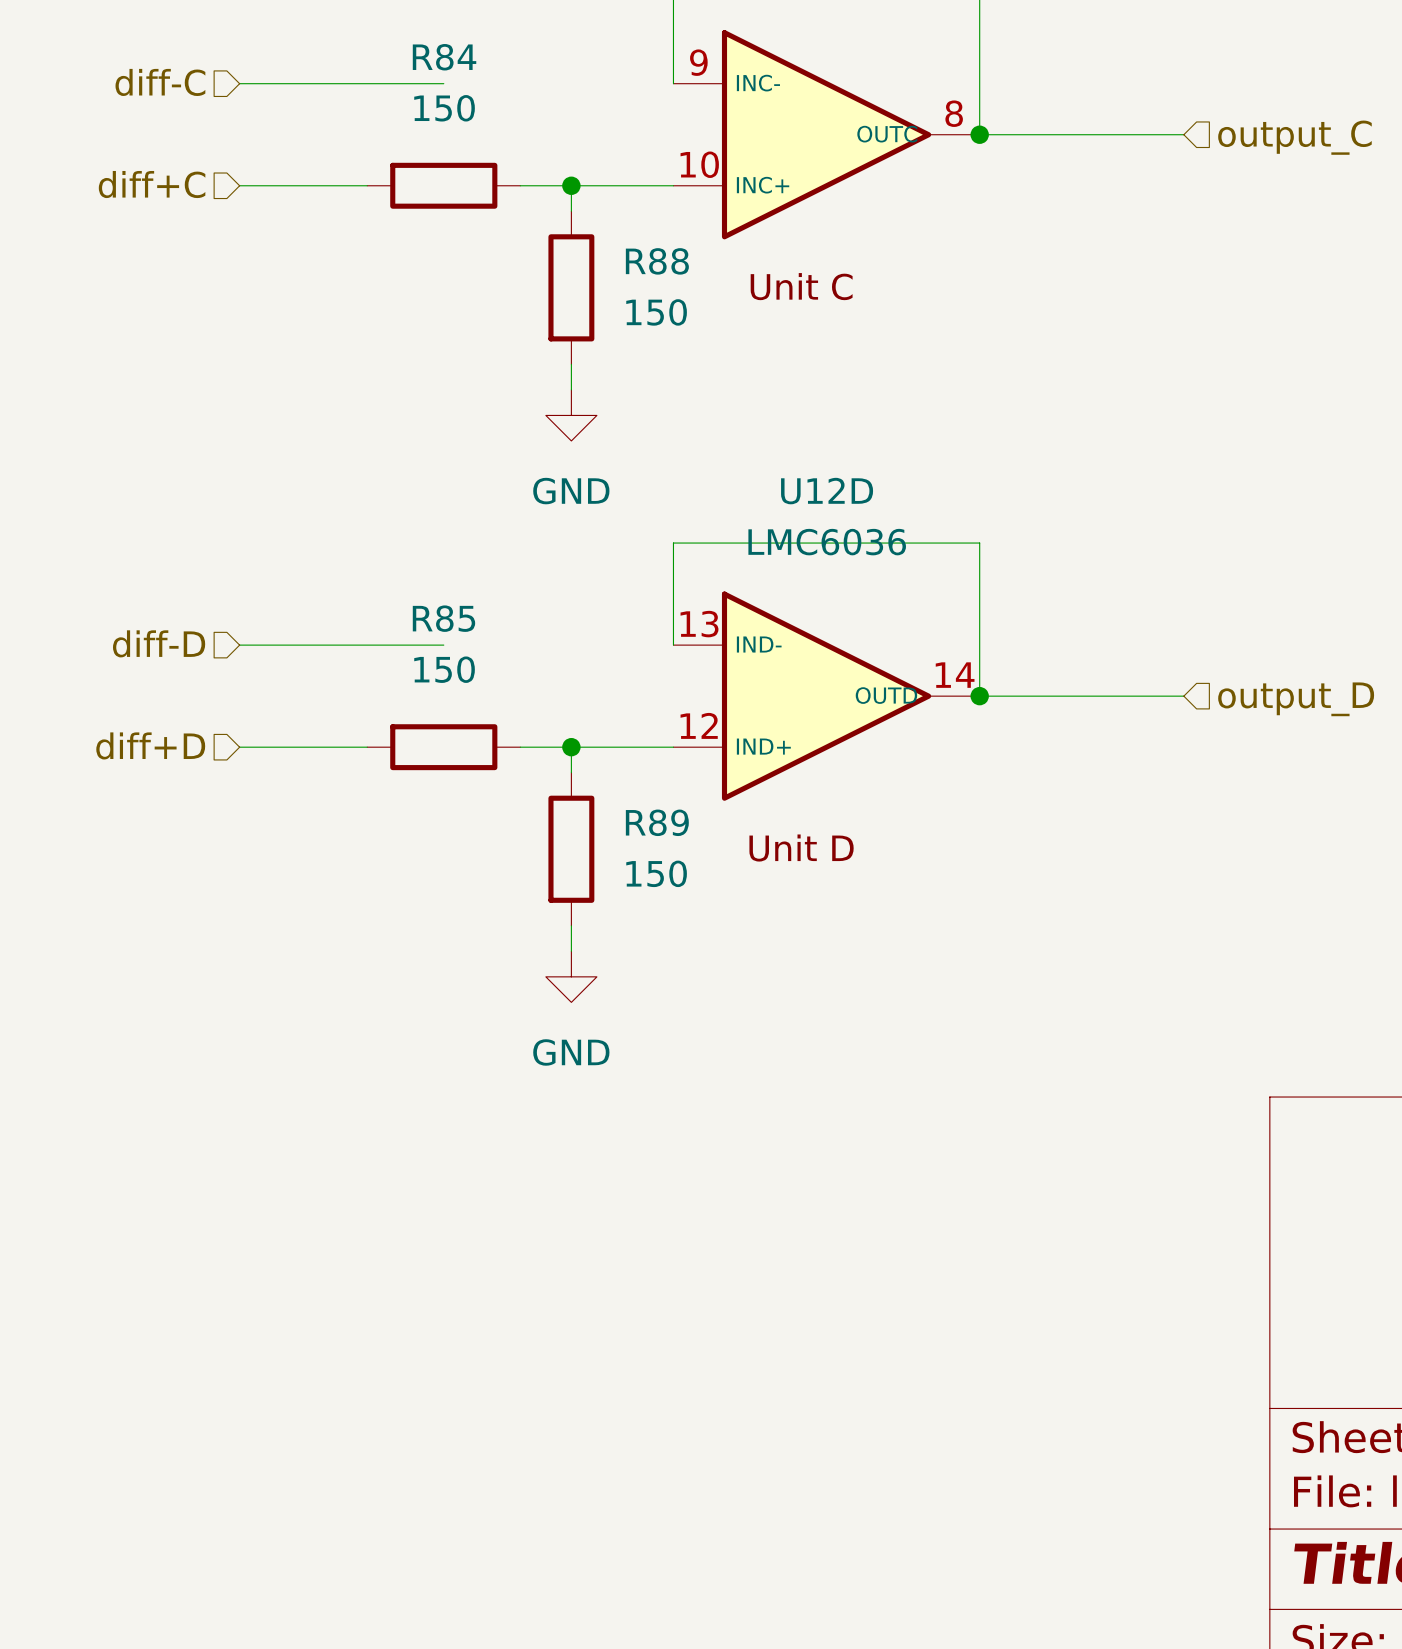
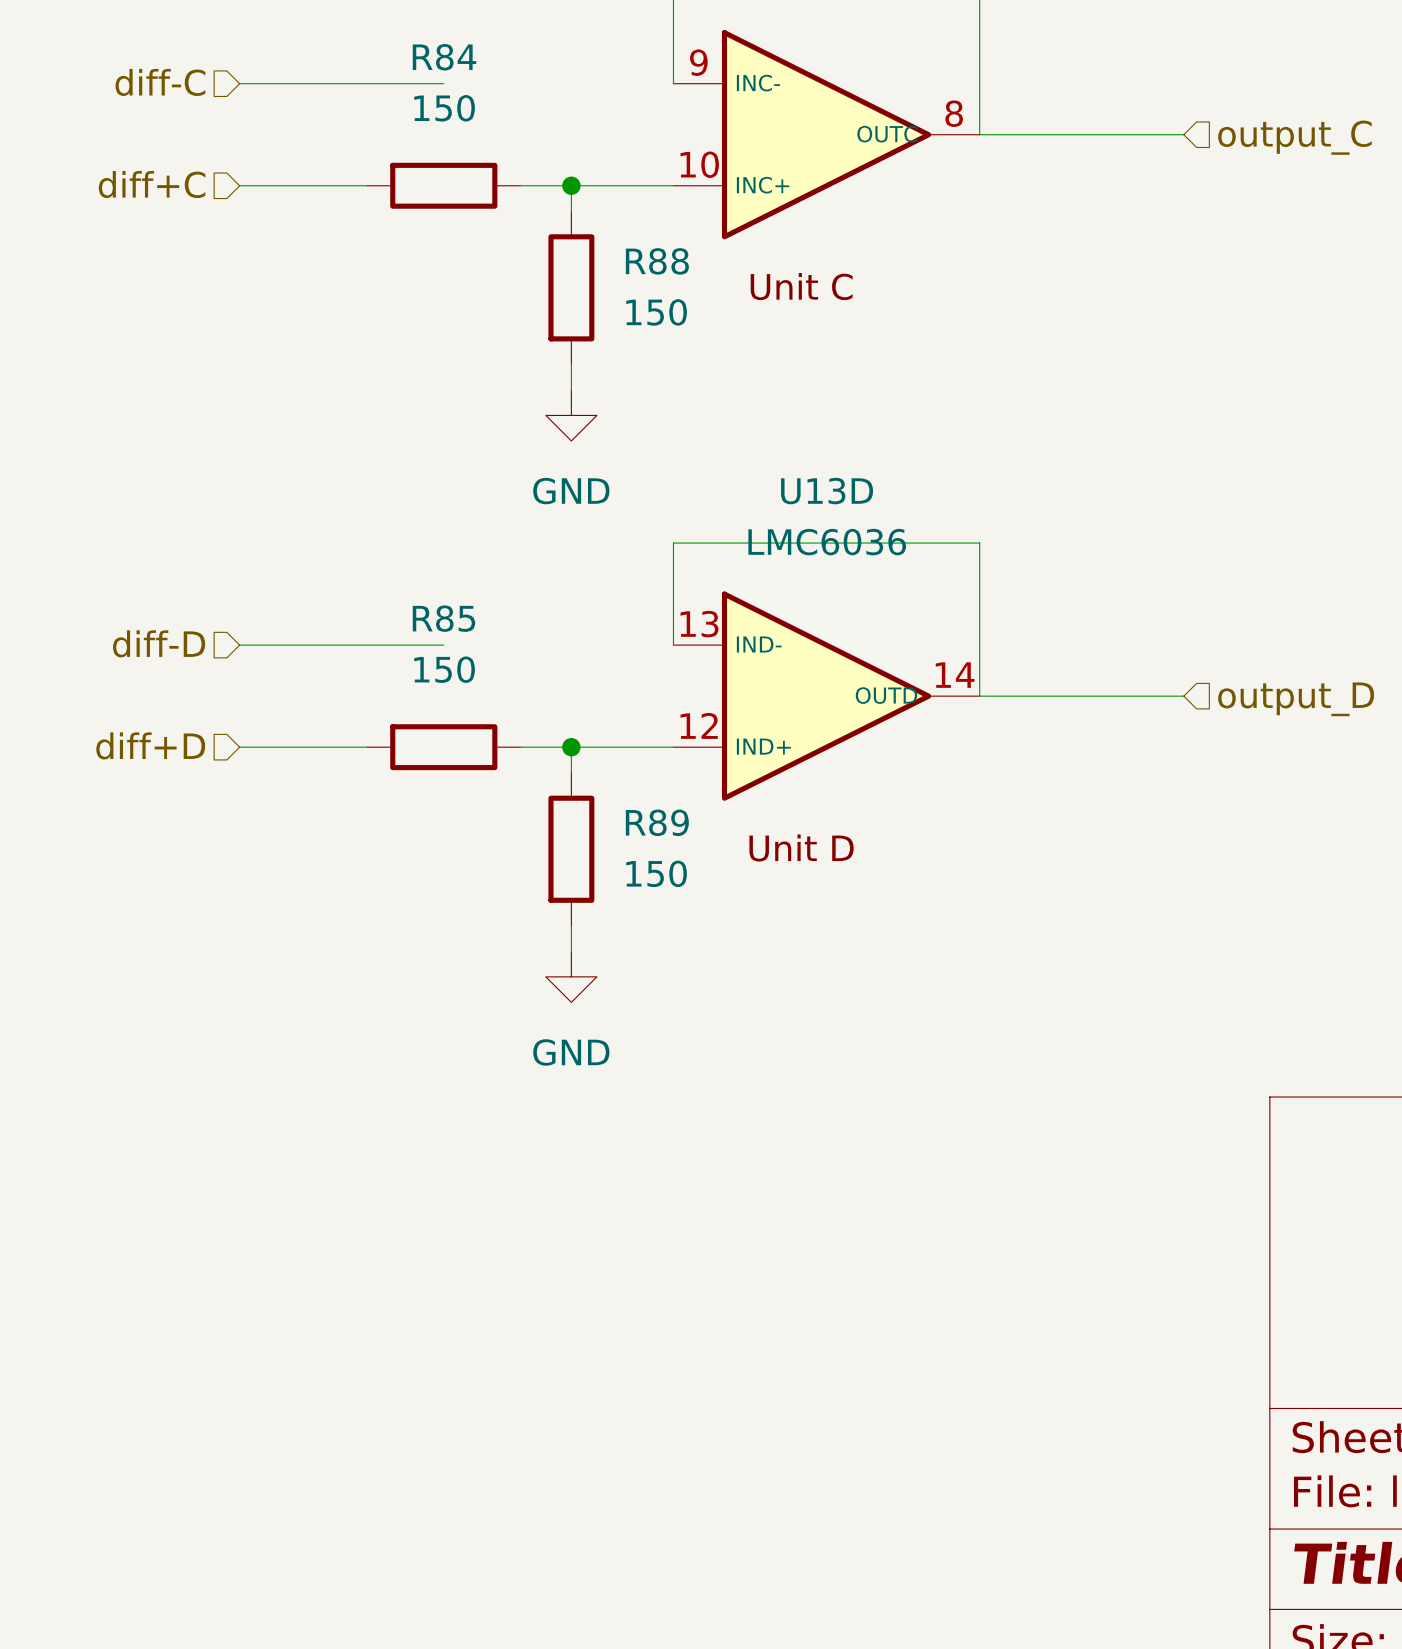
junction: (979, 134) -> none
U12D name: U12D (827, 491) -> U13D (827, 491)
junction: (979, 696) -> none

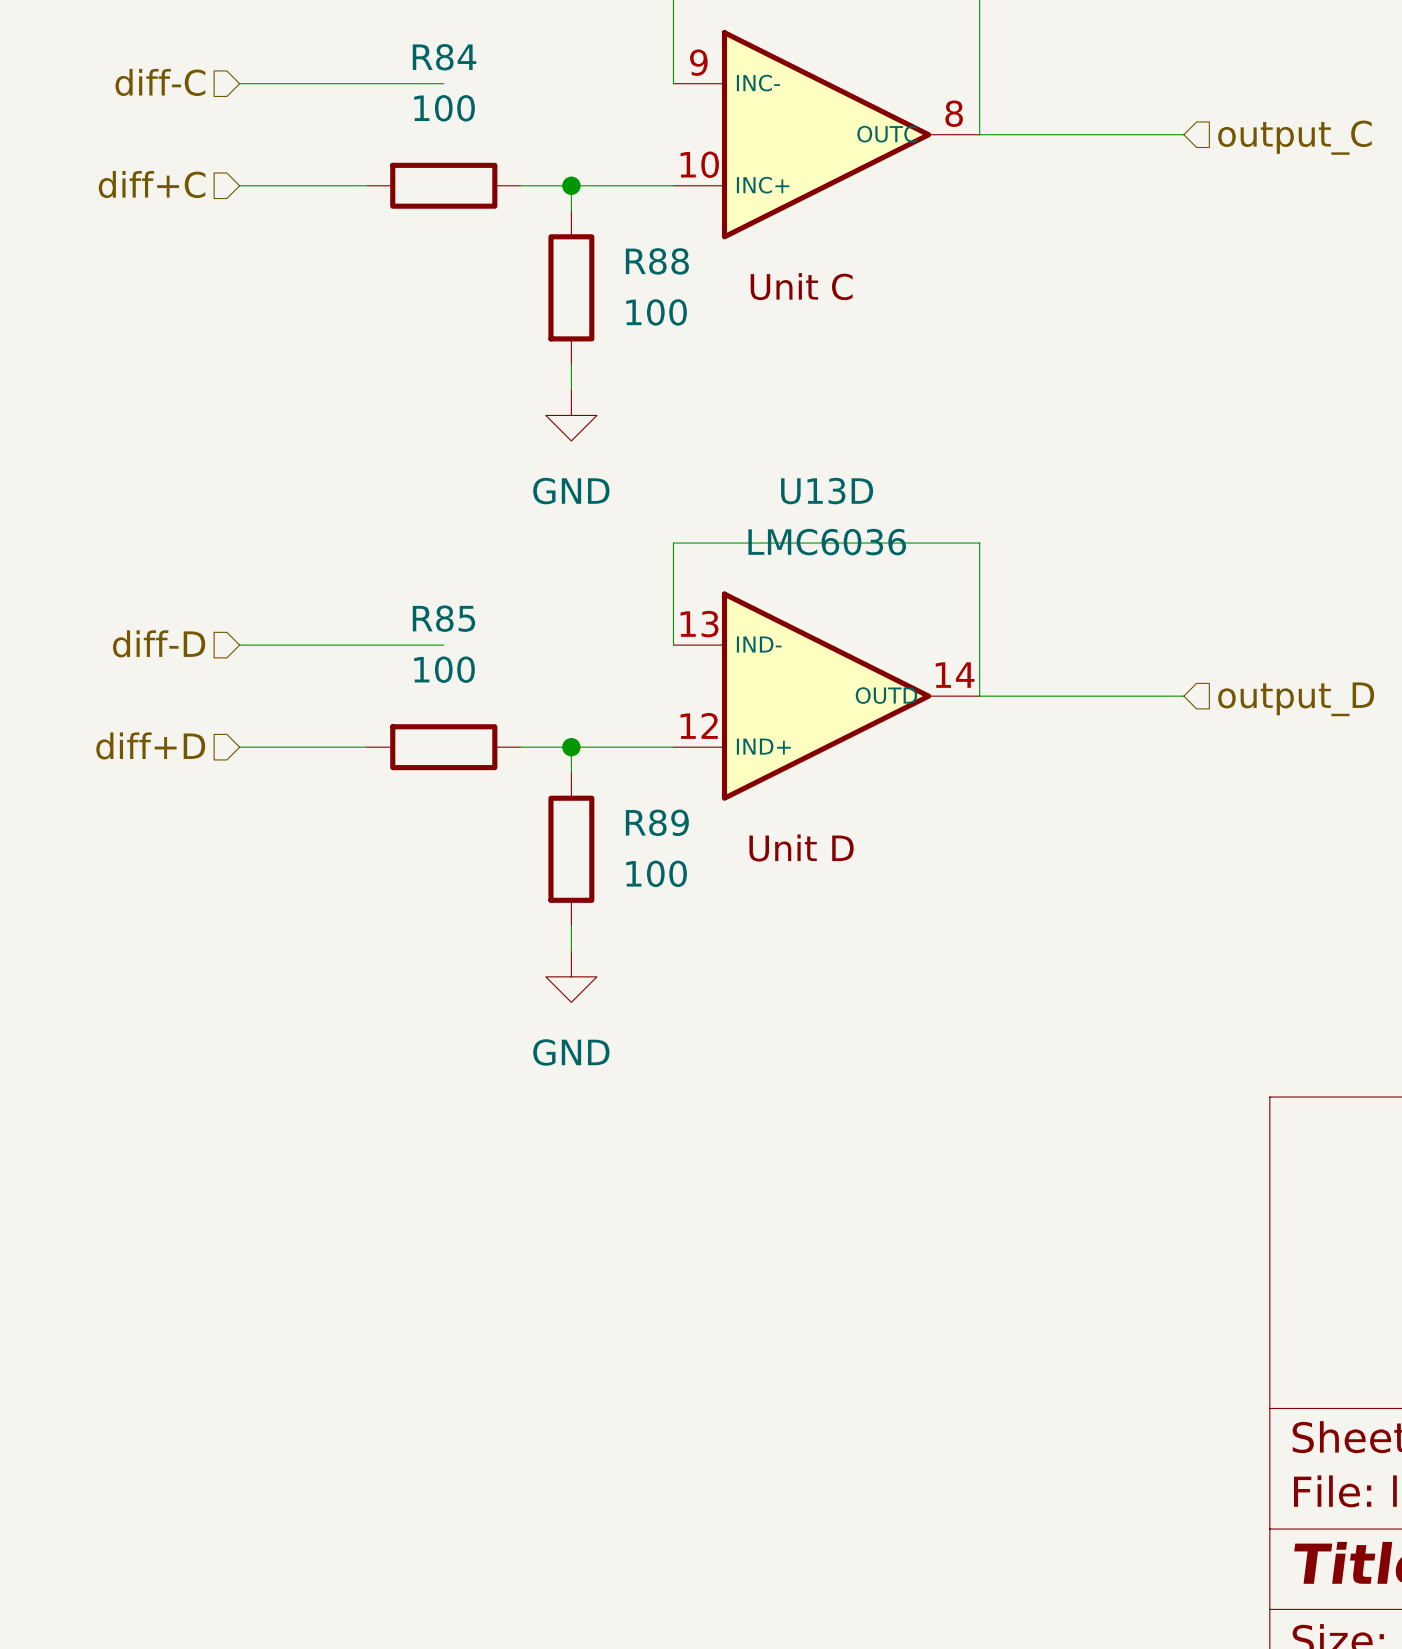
R84 value: 150 (444, 108) -> 100 (444, 108)
R88 value: 150 (656, 312) -> 100 (656, 312)
R85 value: 150 (444, 669) -> 100 (444, 669)
R89 value: 150 (656, 873) -> 100 (656, 873)

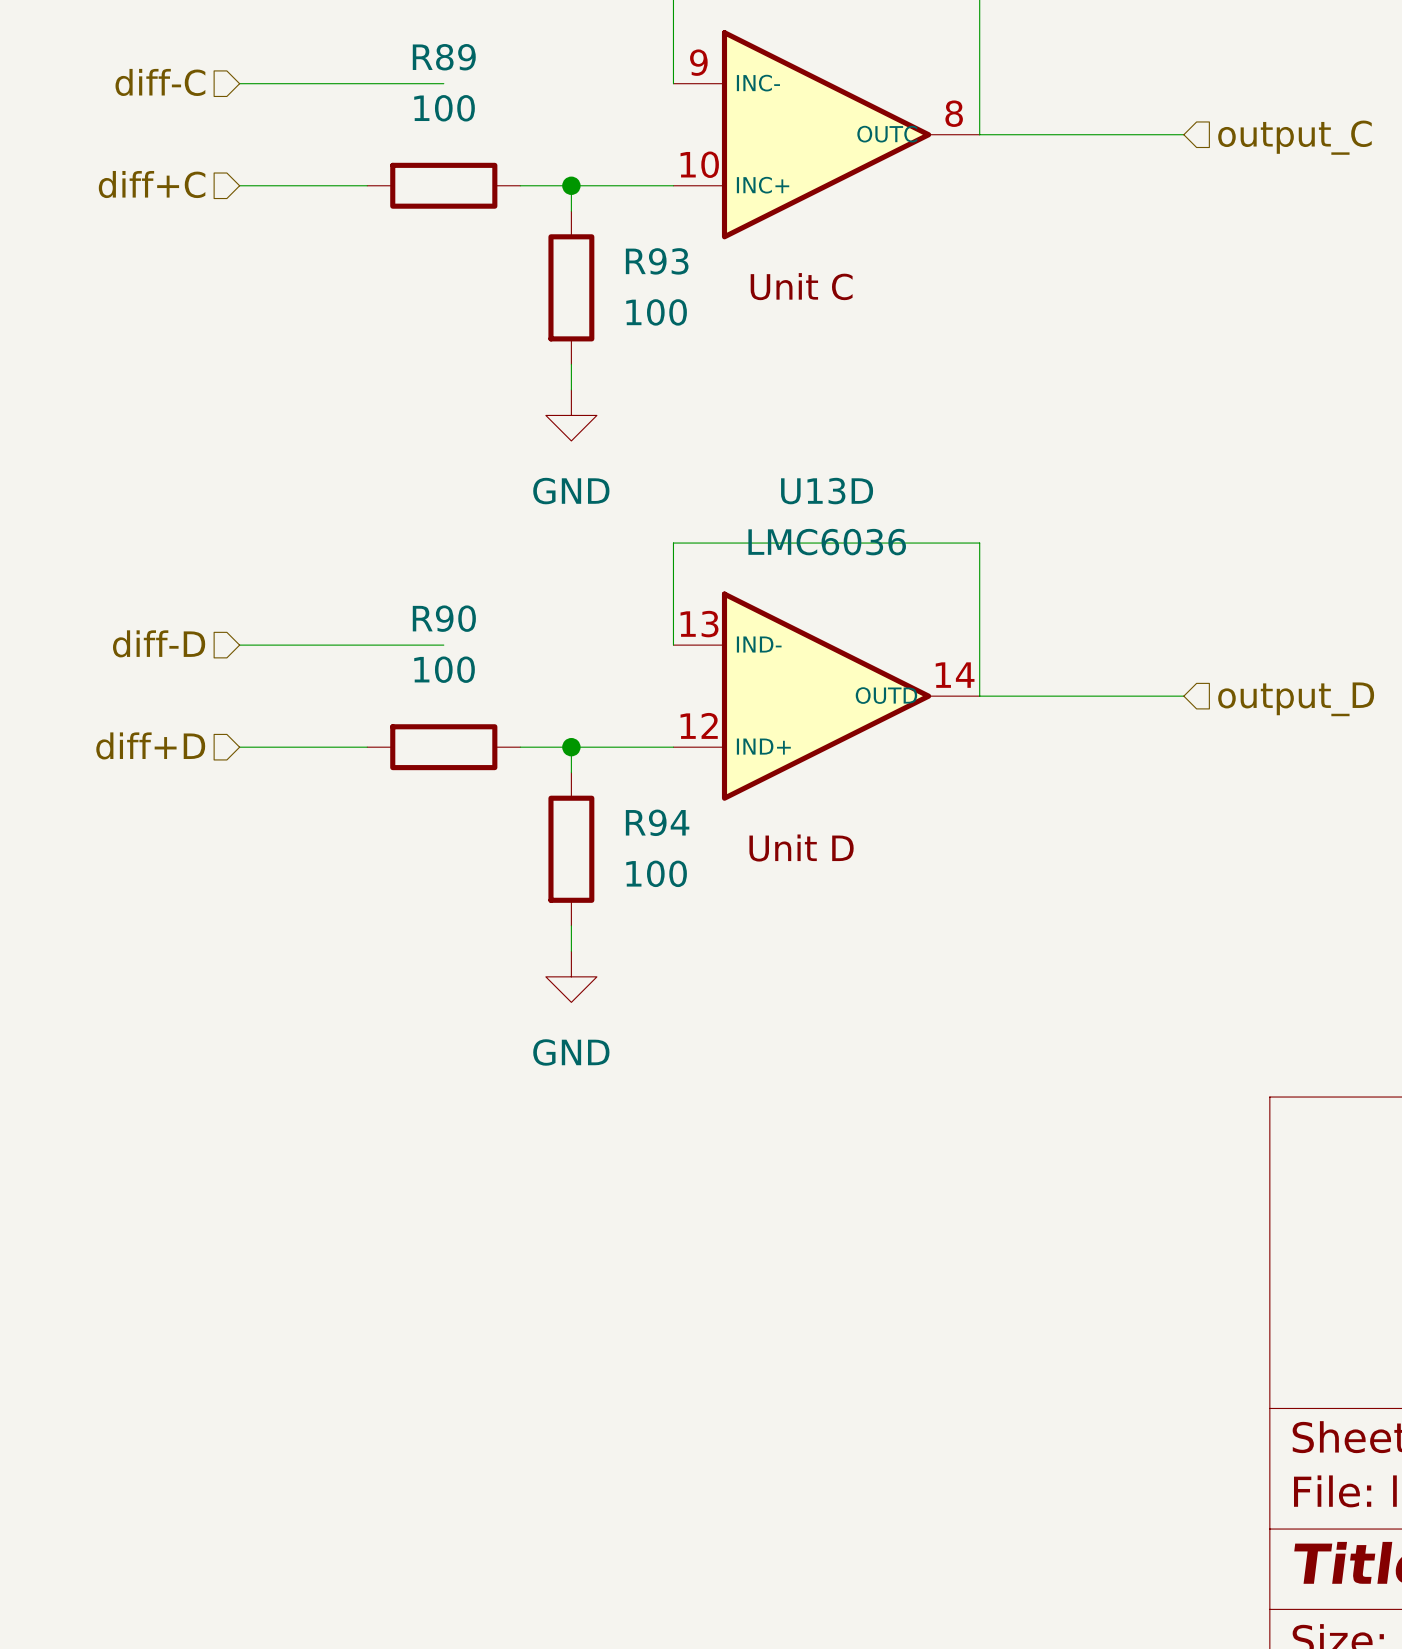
R84 name: R84 (444, 57) -> R89 (444, 57)
R88 name: R88 (657, 261) -> R93 (657, 261)
R85 name: R85 (443, 618) -> R90 (444, 618)
R89 name: R89 (657, 822) -> R94 (657, 822)

